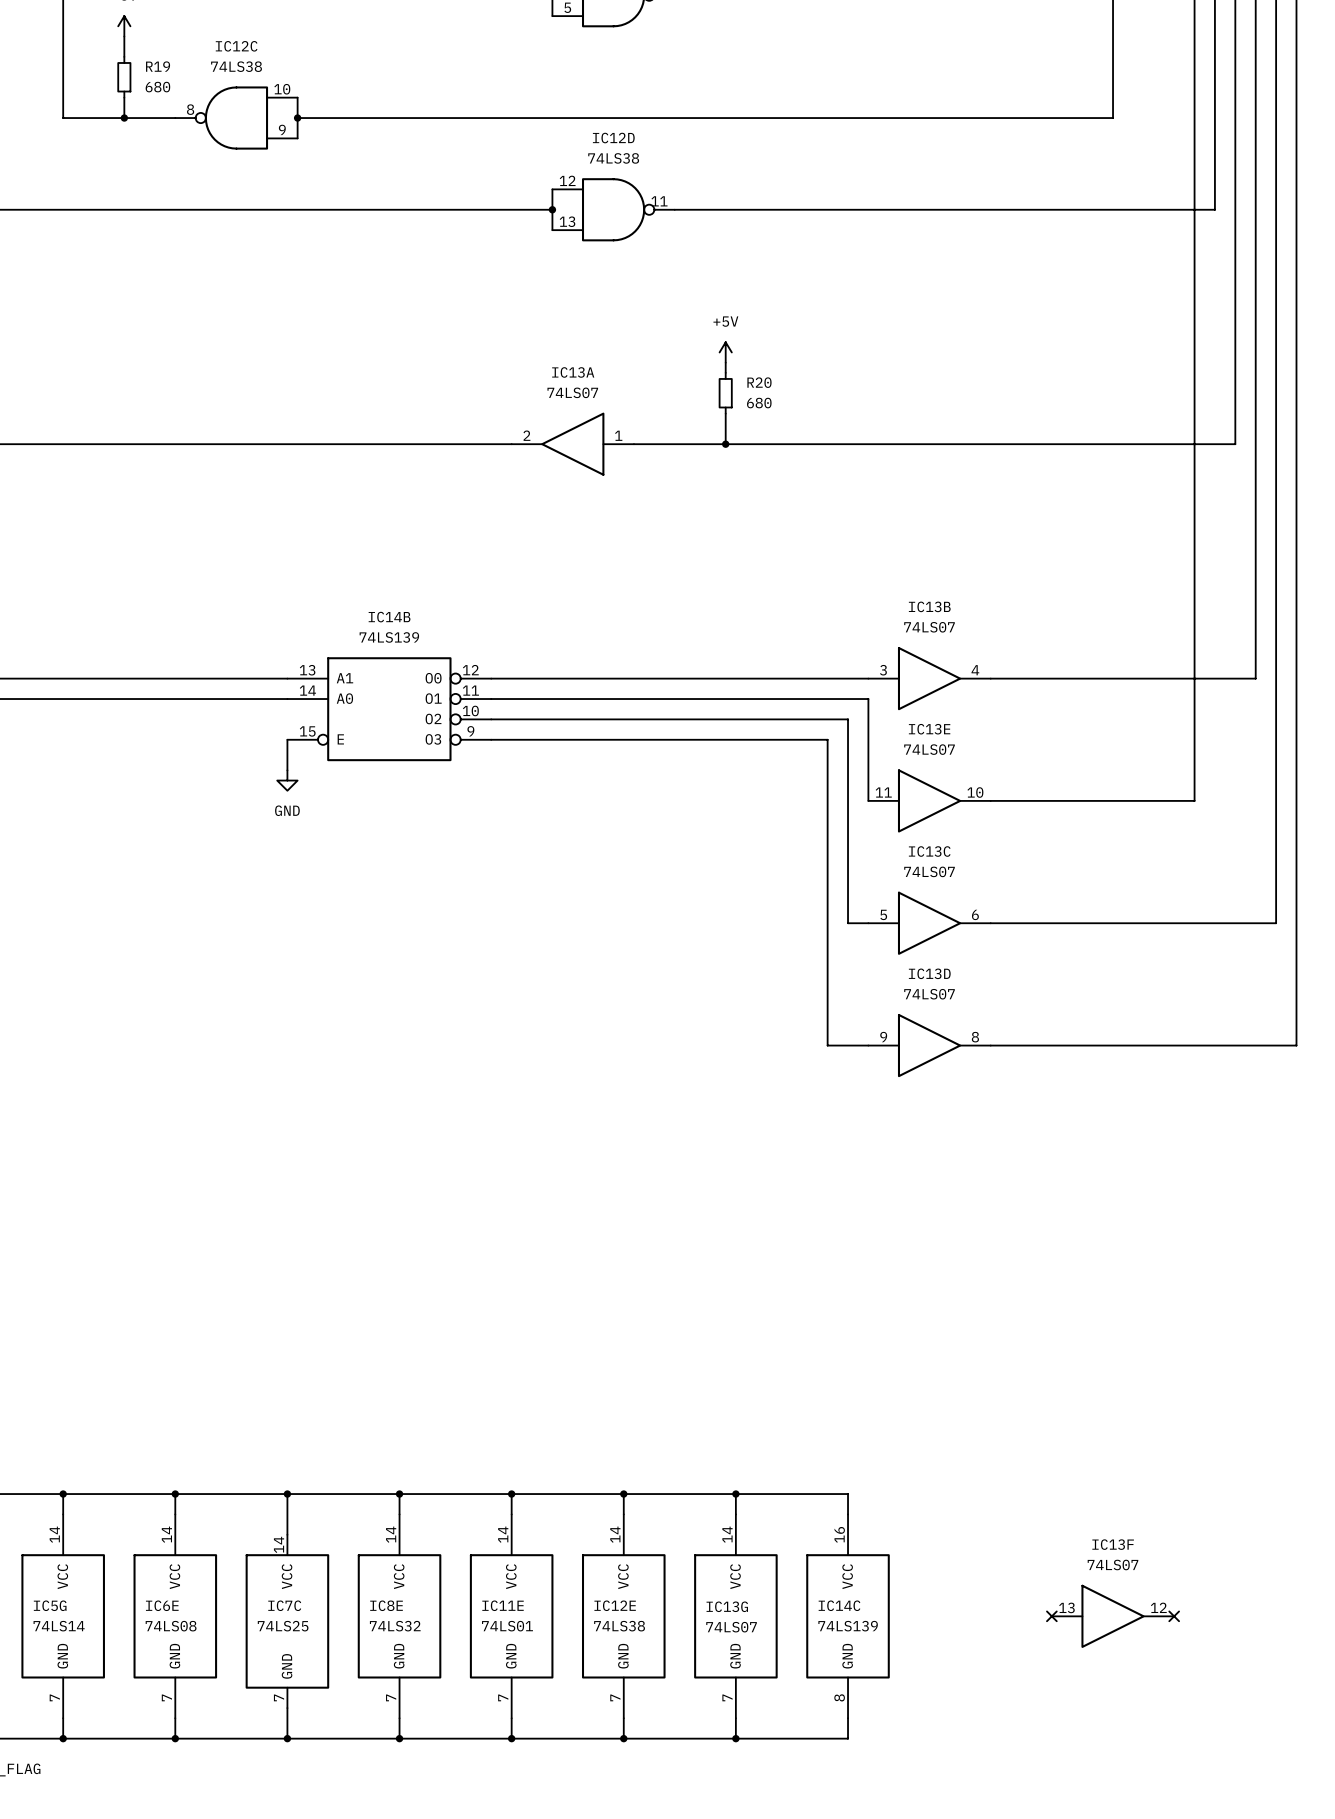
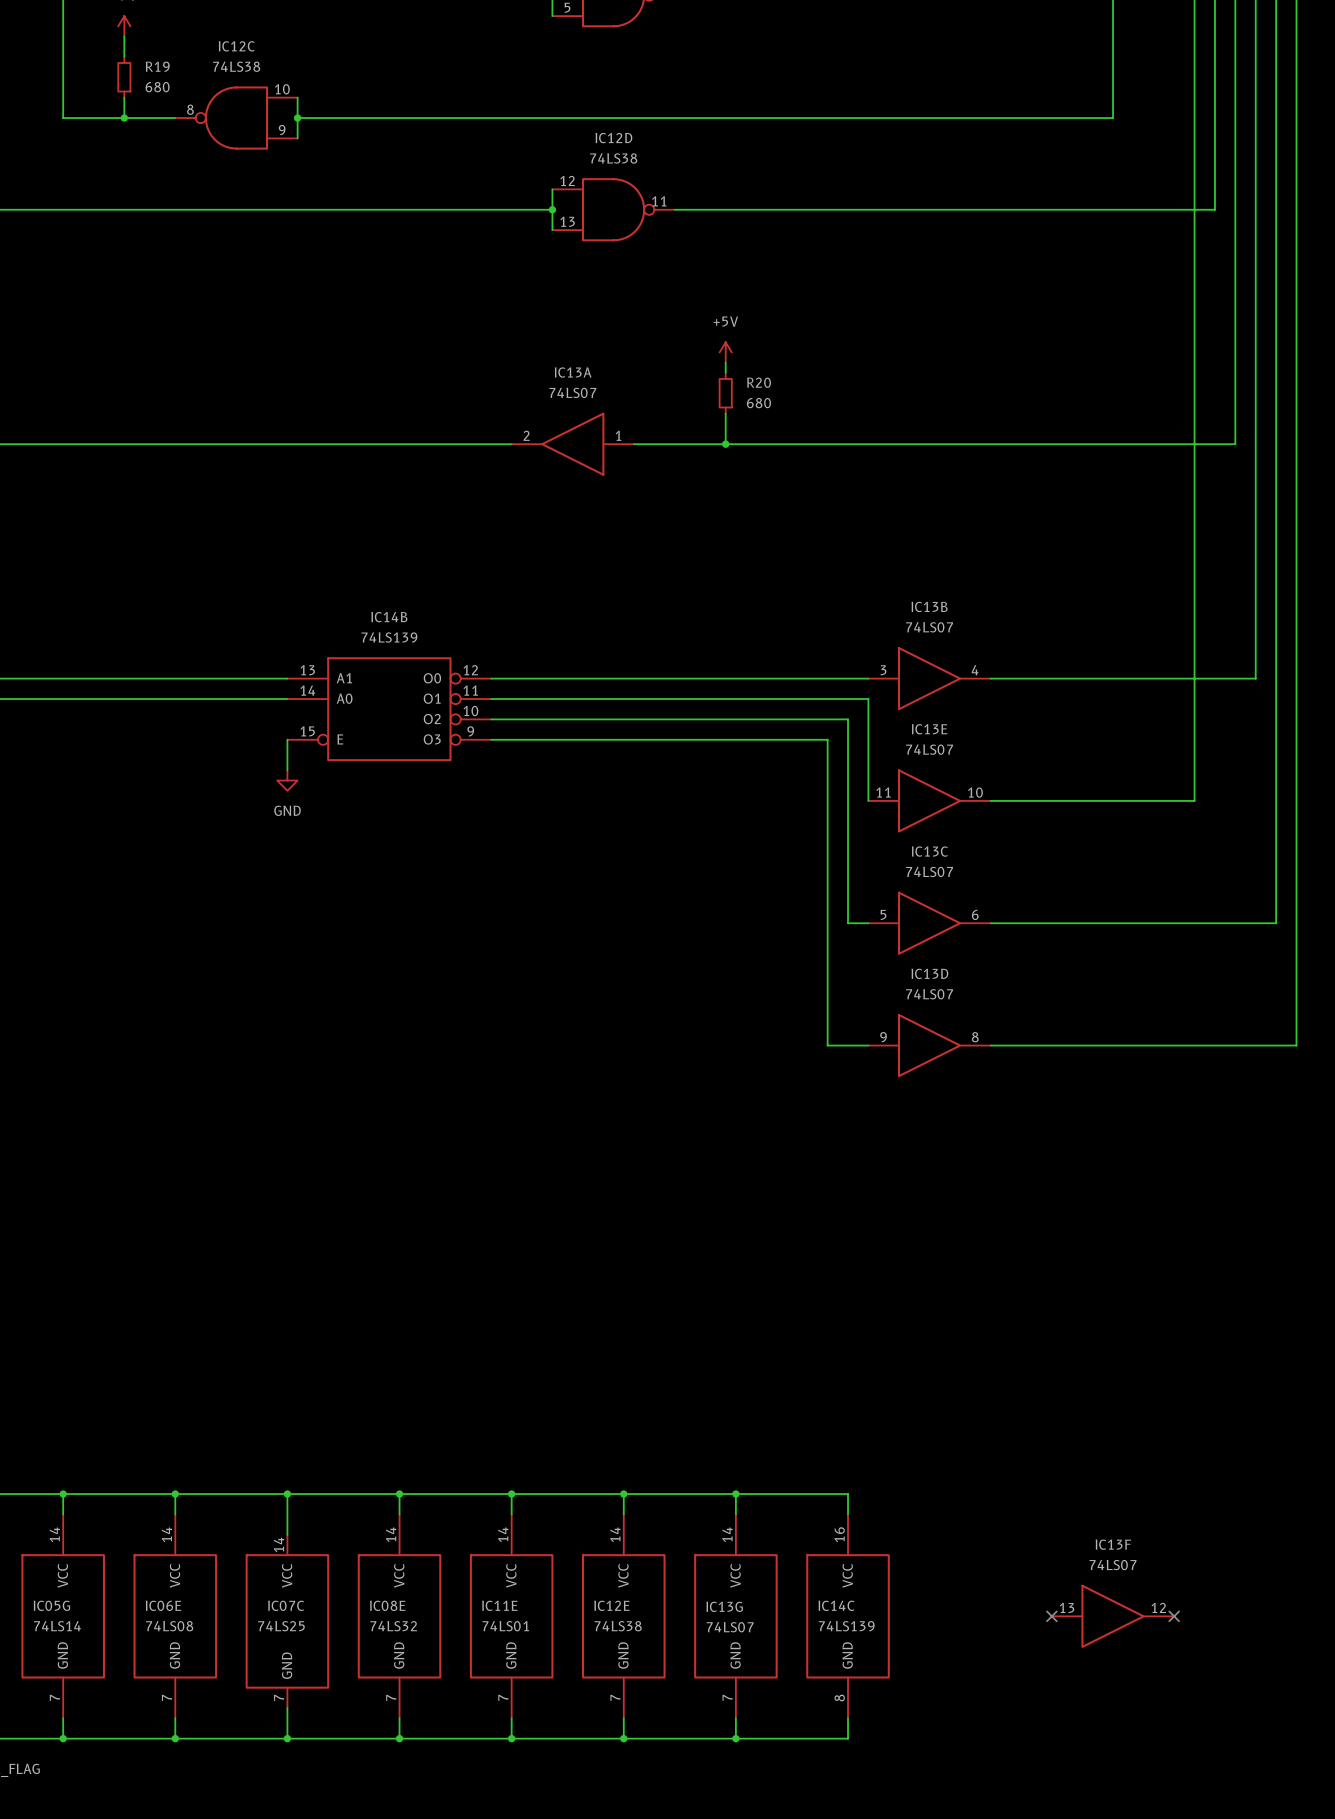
IC5G name: IC5G (50, 1605) -> IC05G (51, 1605)
IC6E name: IC6E (162, 1605) -> IC06E (163, 1605)
IC7C name: IC7C (284, 1605) -> IC07C (286, 1605)
IC8E name: IC8E (386, 1605) -> IC08E (387, 1605)

